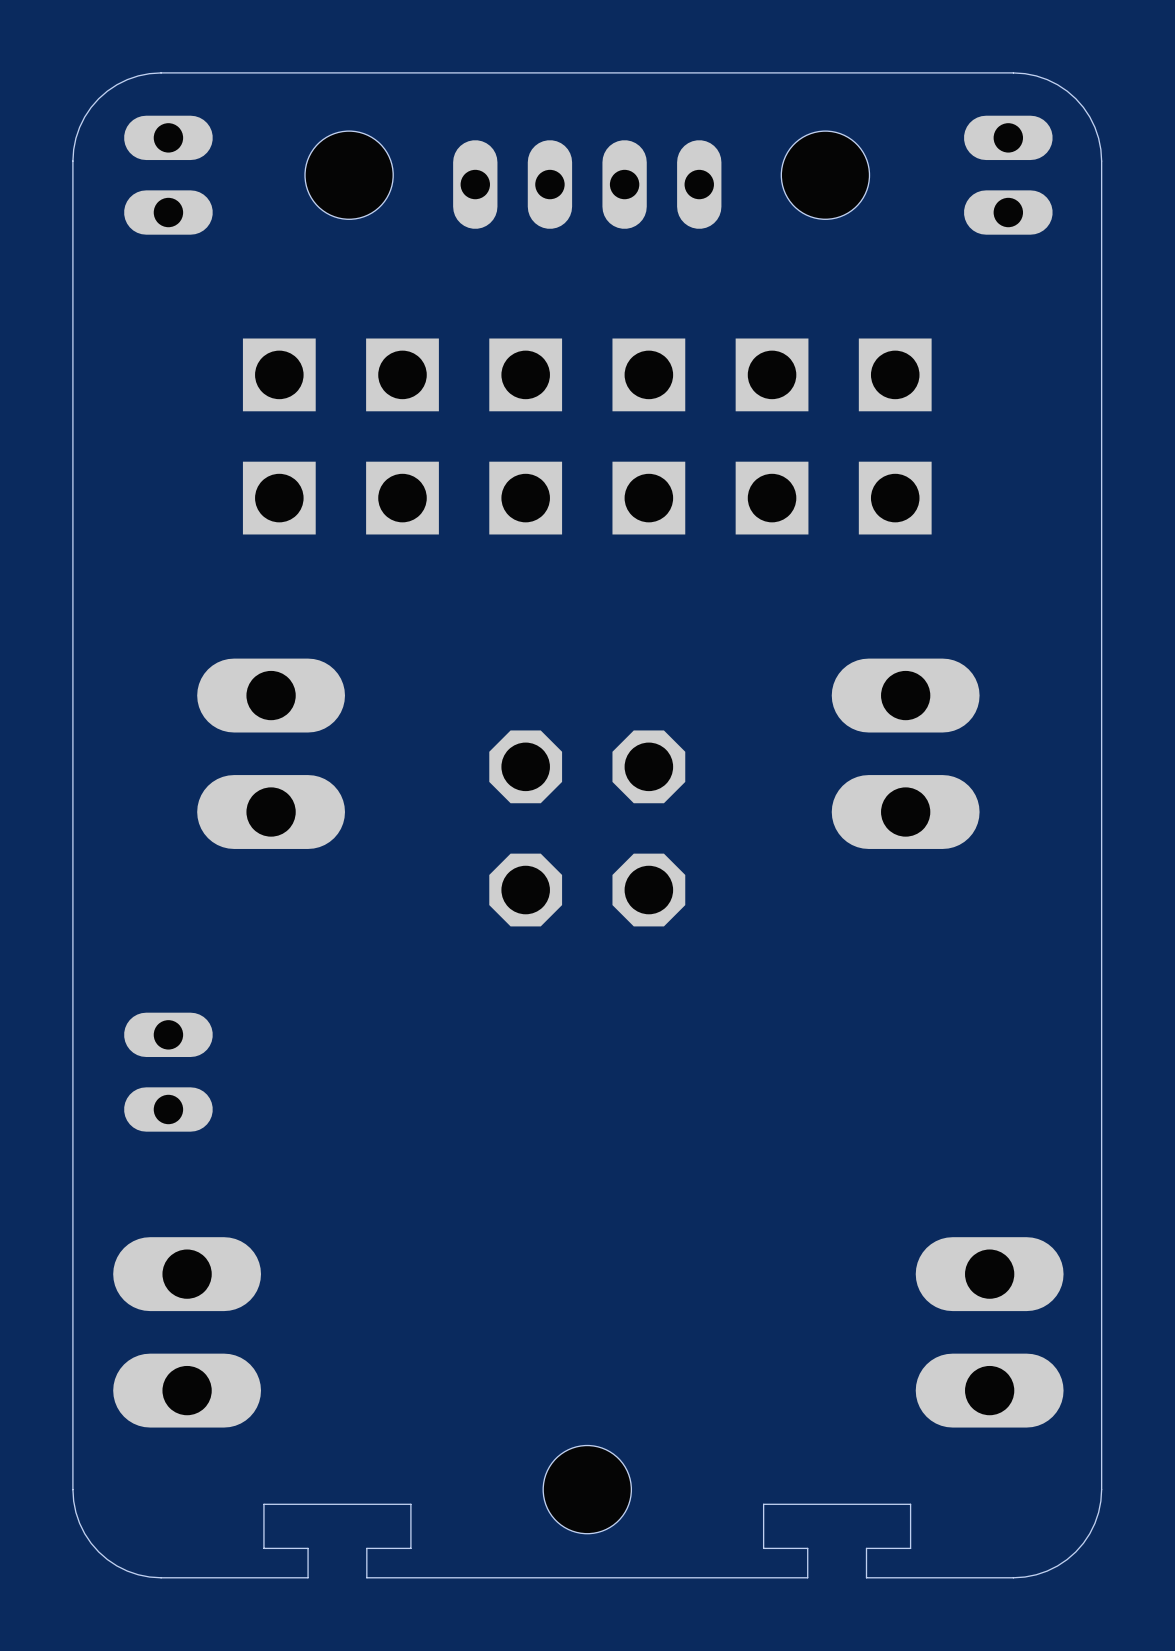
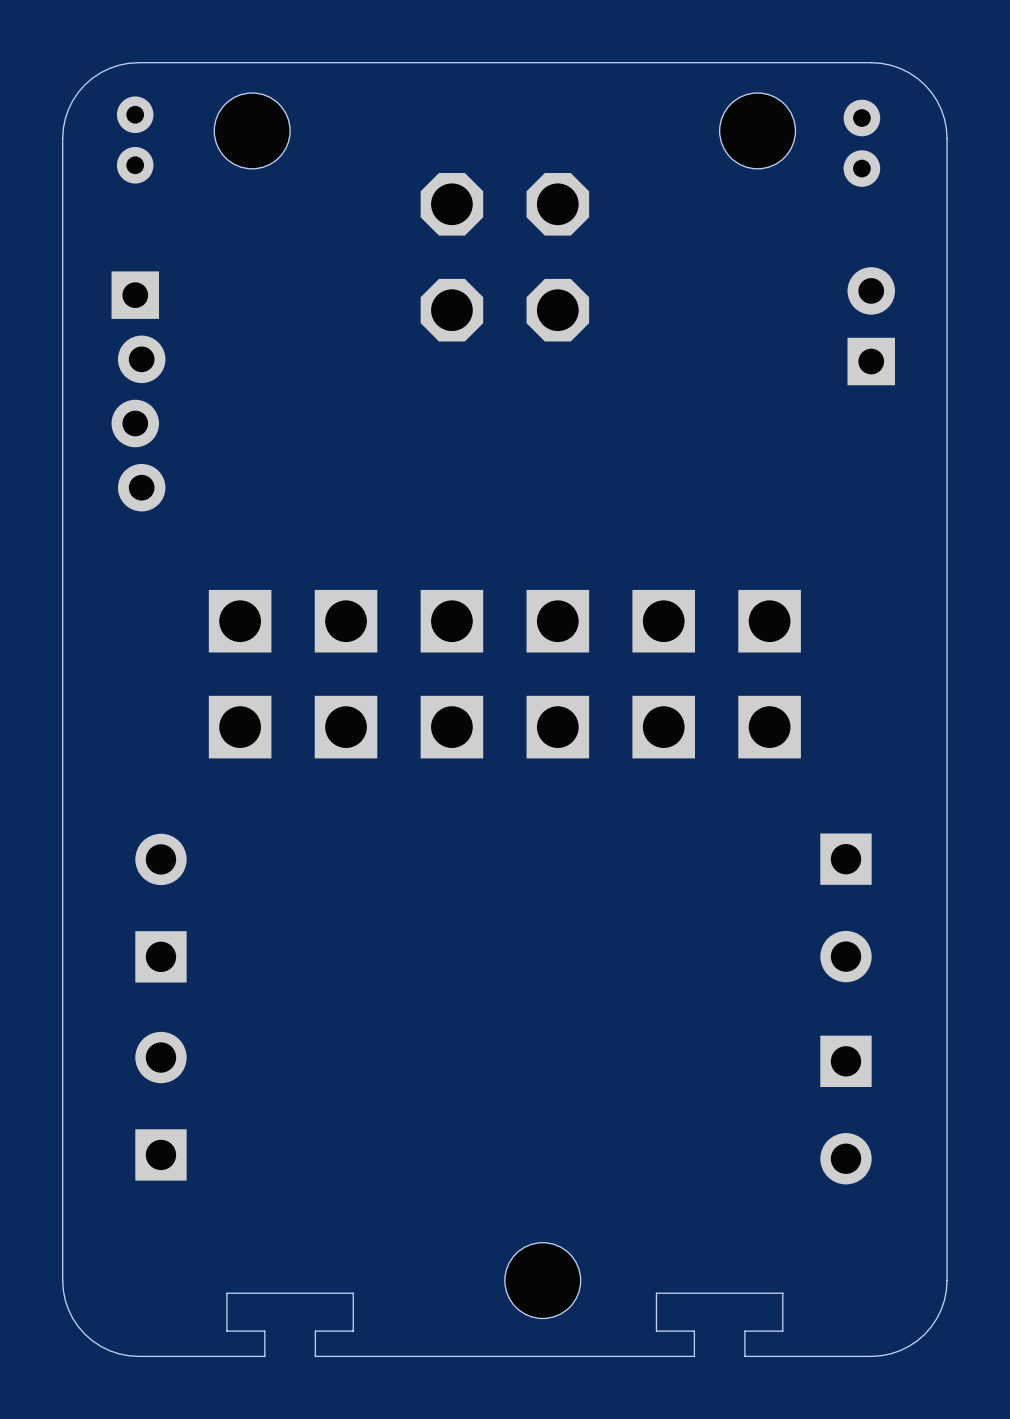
part footprint: [124, 115, 213, 235] -> [116, 96, 154, 184]
part footprint: [963, 115, 1053, 235] -> [843, 99, 881, 187]
hole position: (349, 175) -> (252, 130)
hole position: (825, 175) -> (757, 130)
part: (587, 184) -> none
part: none -> (871, 326)
part position: (587, 436) -> (504, 674)
part: none -> (138, 391)
part: (271, 753) -> none
part: (905, 753) -> none
part position: (587, 828) -> (504, 257)
part footprint: [124, 1012, 213, 1132] -> [135, 833, 187, 983]
part: none -> (845, 907)
part: none -> (160, 1106)
part: none -> (845, 1110)
part: (187, 1332) -> none
part: (989, 1332) -> none
hole position: (587, 1489) -> (542, 1280)

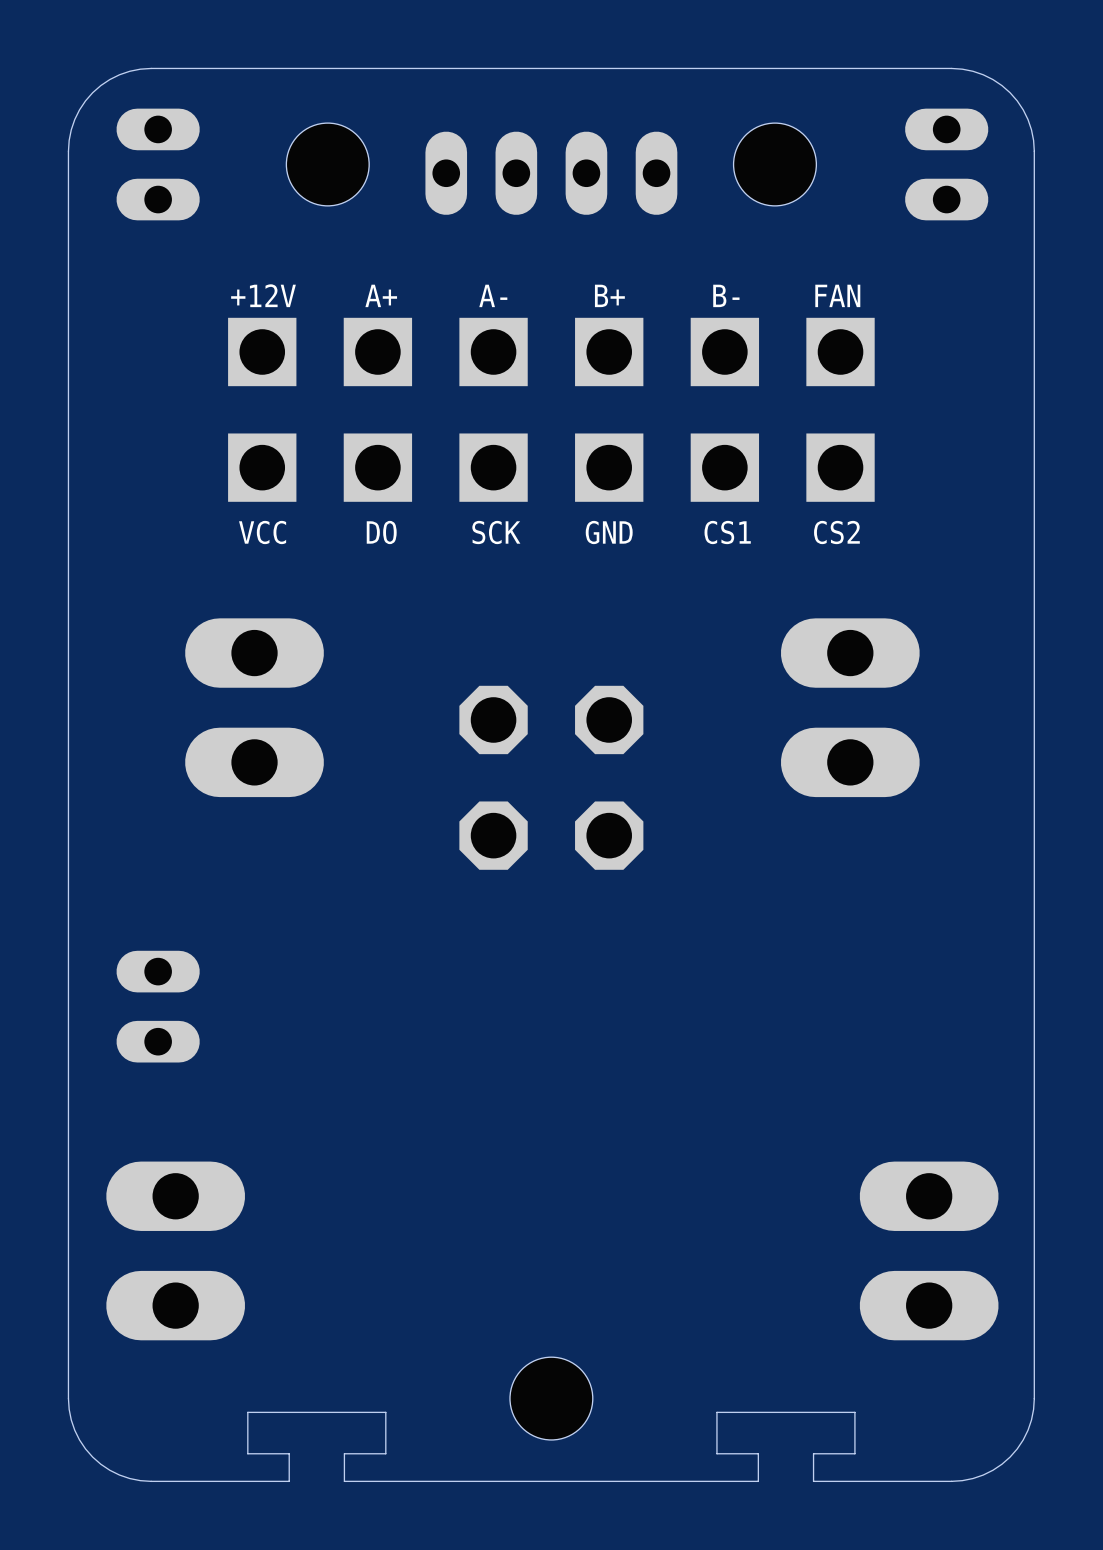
part footprint: [116, 96, 154, 184] -> [116, 108, 200, 221]
part footprint: [843, 99, 881, 187] -> [905, 108, 989, 221]
hole position: (252, 130) -> (327, 164)
hole position: (757, 130) -> (774, 164)
part: none -> (551, 173)
part position: (504, 257) -> (551, 777)
text: none -> +12V (263, 295)
text: none -> A+ (381, 295)
text: none -> A- (493, 295)
text: none -> B+ (609, 295)
text: none -> B- (726, 295)
text: none -> FAN (837, 295)
part: (871, 326) -> none
part: (138, 391) -> none
text: none -> VCC (262, 532)
text: none -> DO (381, 532)
text: none -> SCK (496, 532)
text: none -> GND (609, 532)
text: none -> CS1 (727, 532)
text: none -> CS2 (836, 532)
part: none -> (254, 707)
part: none -> (850, 707)
part position: (504, 674) -> (551, 409)
part footprint: [135, 833, 187, 983] -> [116, 950, 200, 1063]
part: (845, 907) -> none
part: (160, 1106) -> none
part: (845, 1110) -> none
part: none -> (175, 1250)
part: none -> (929, 1250)
hole position: (542, 1280) -> (551, 1398)

